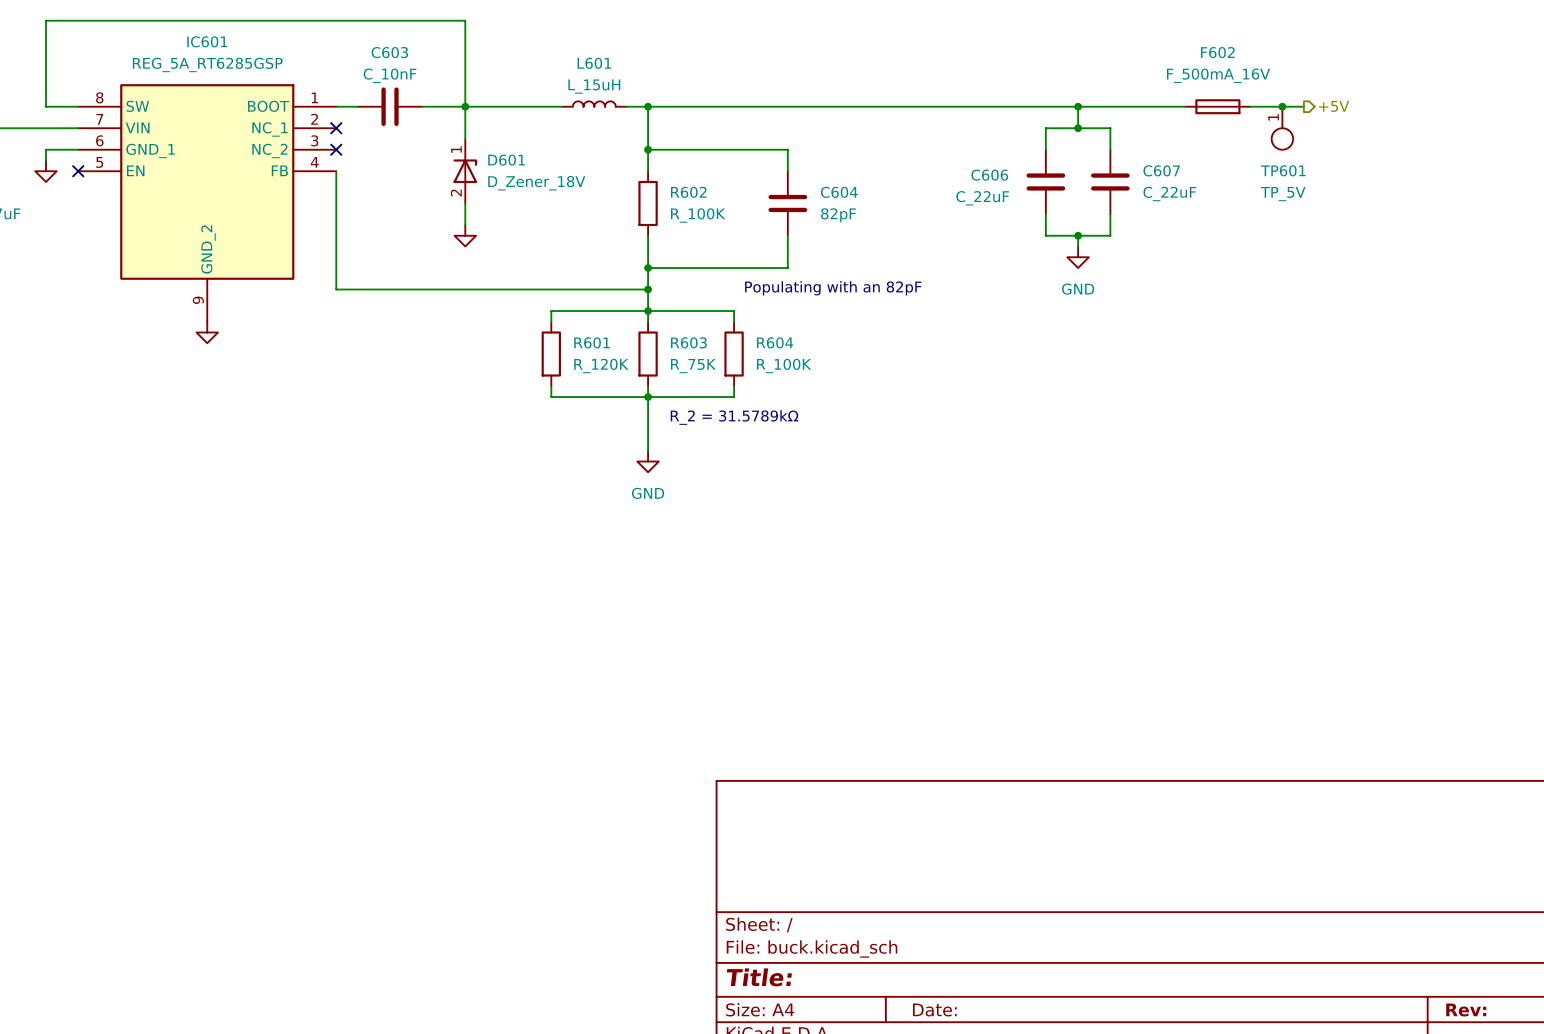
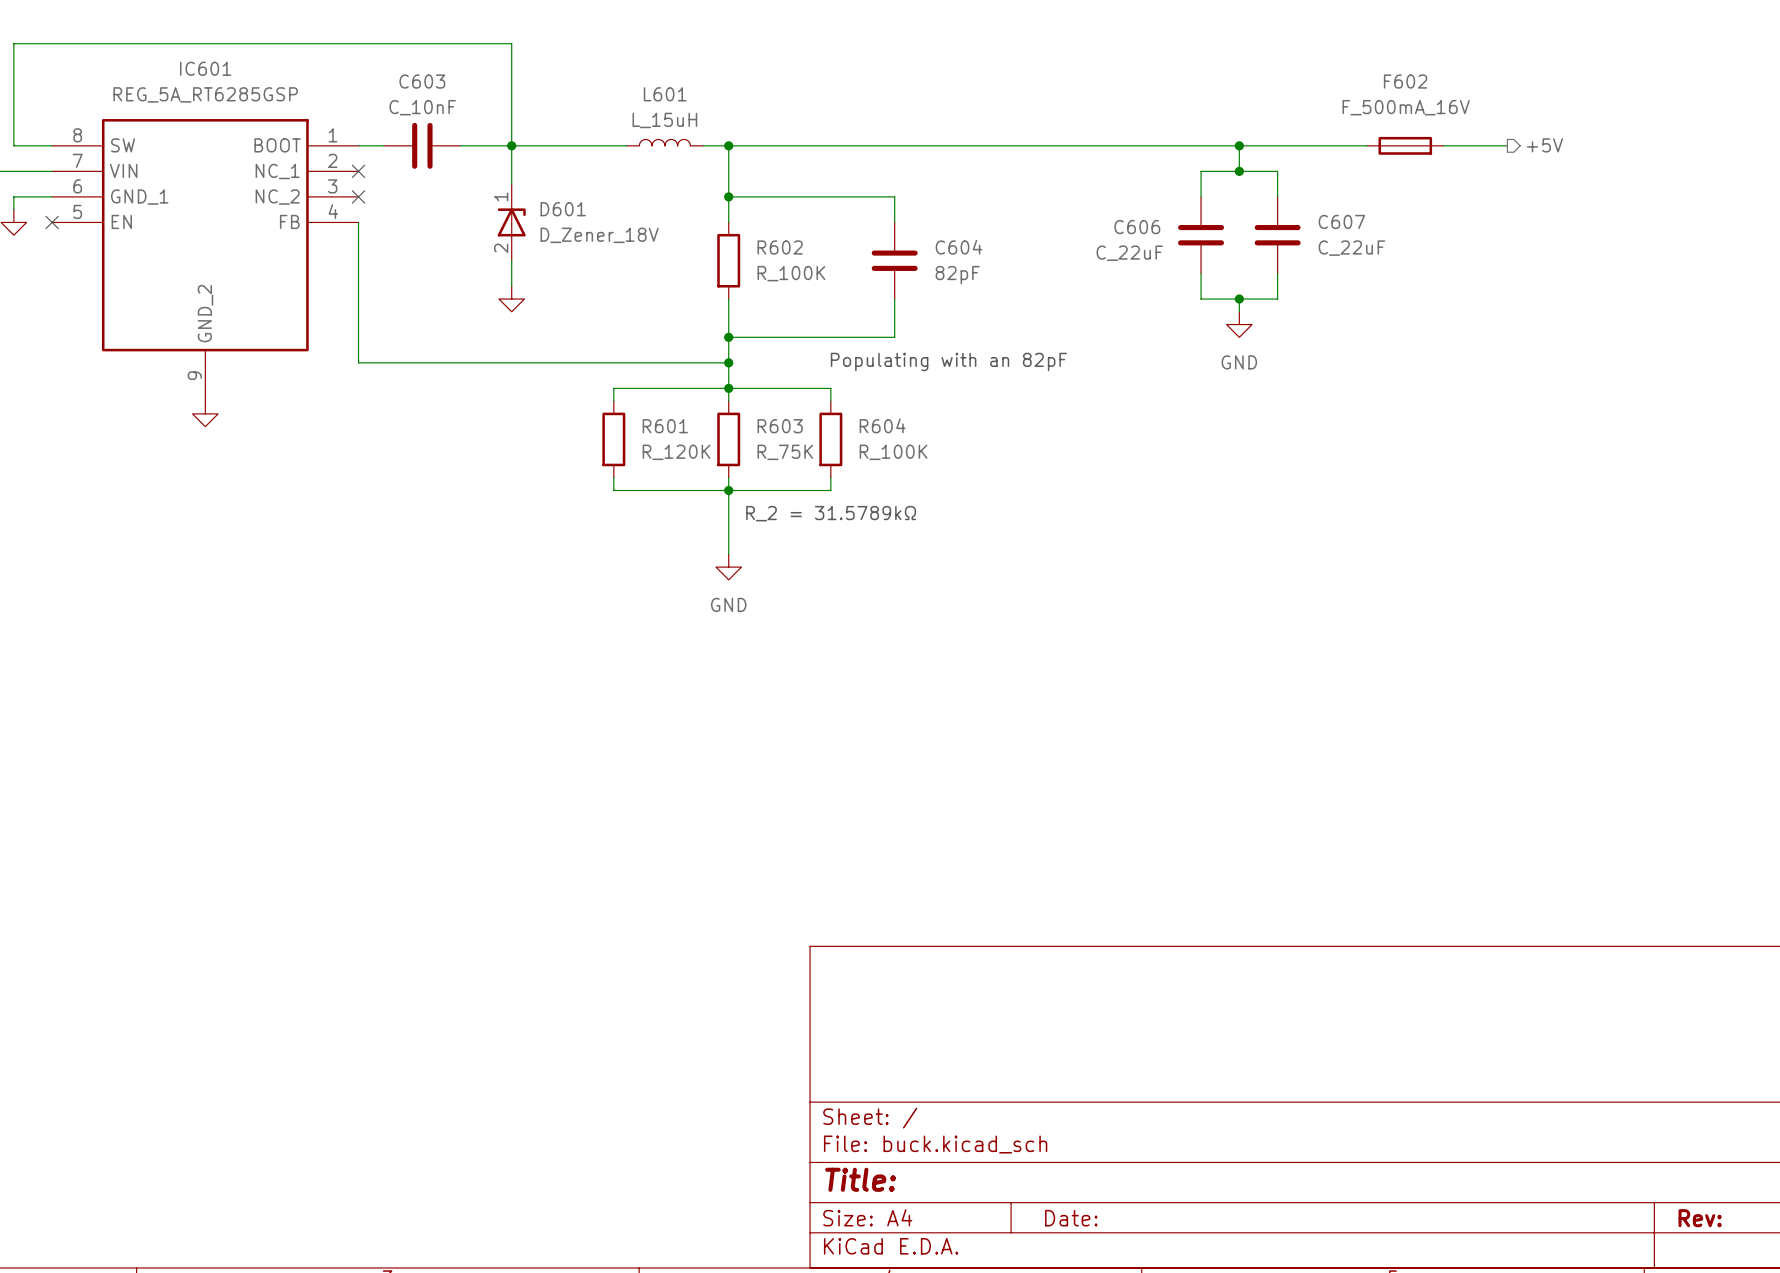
junction: (1282, 106) -> none
TP601: TP_5V (1282, 128) -> none

